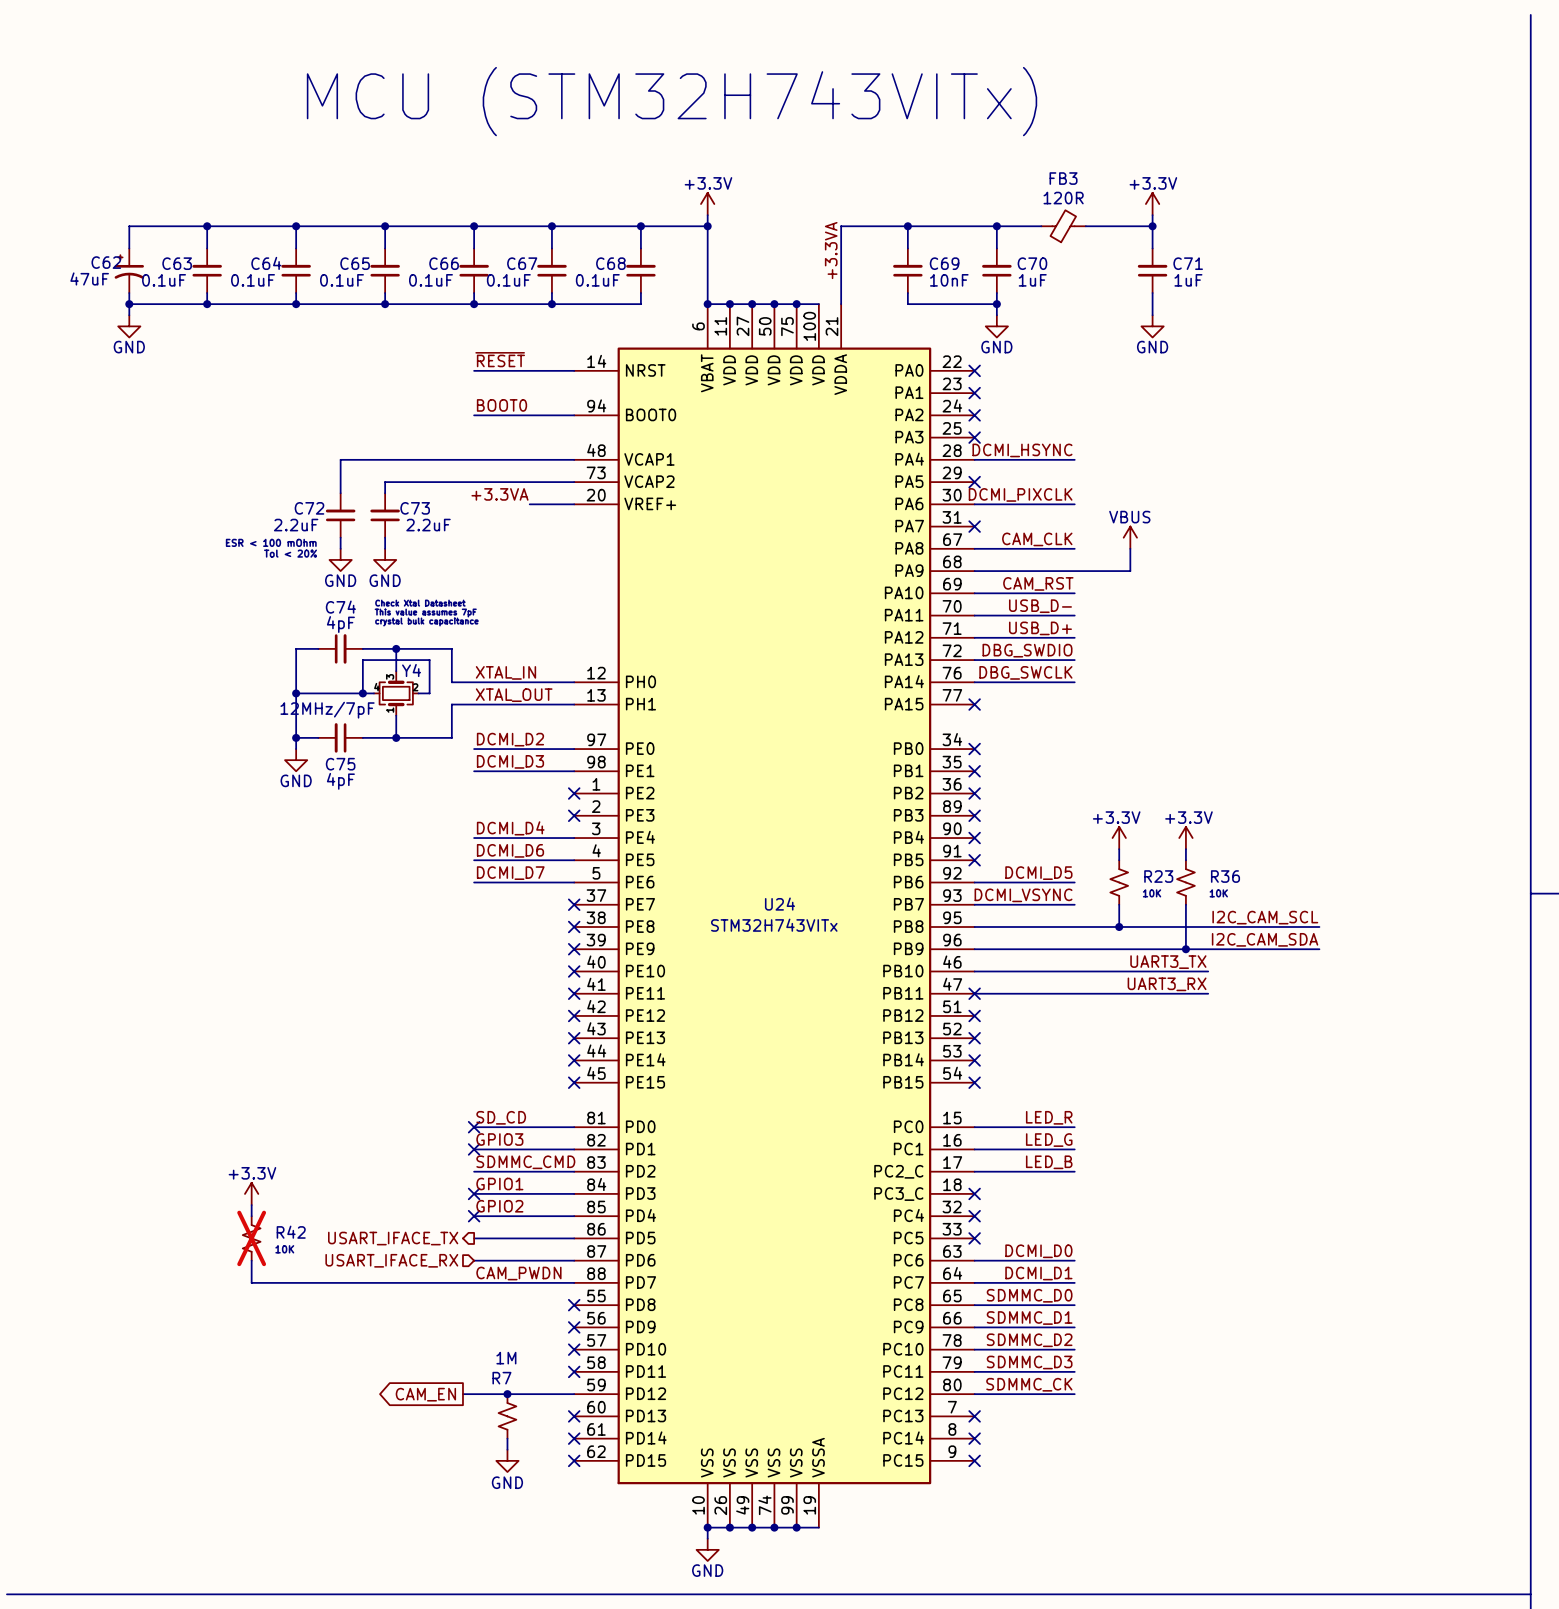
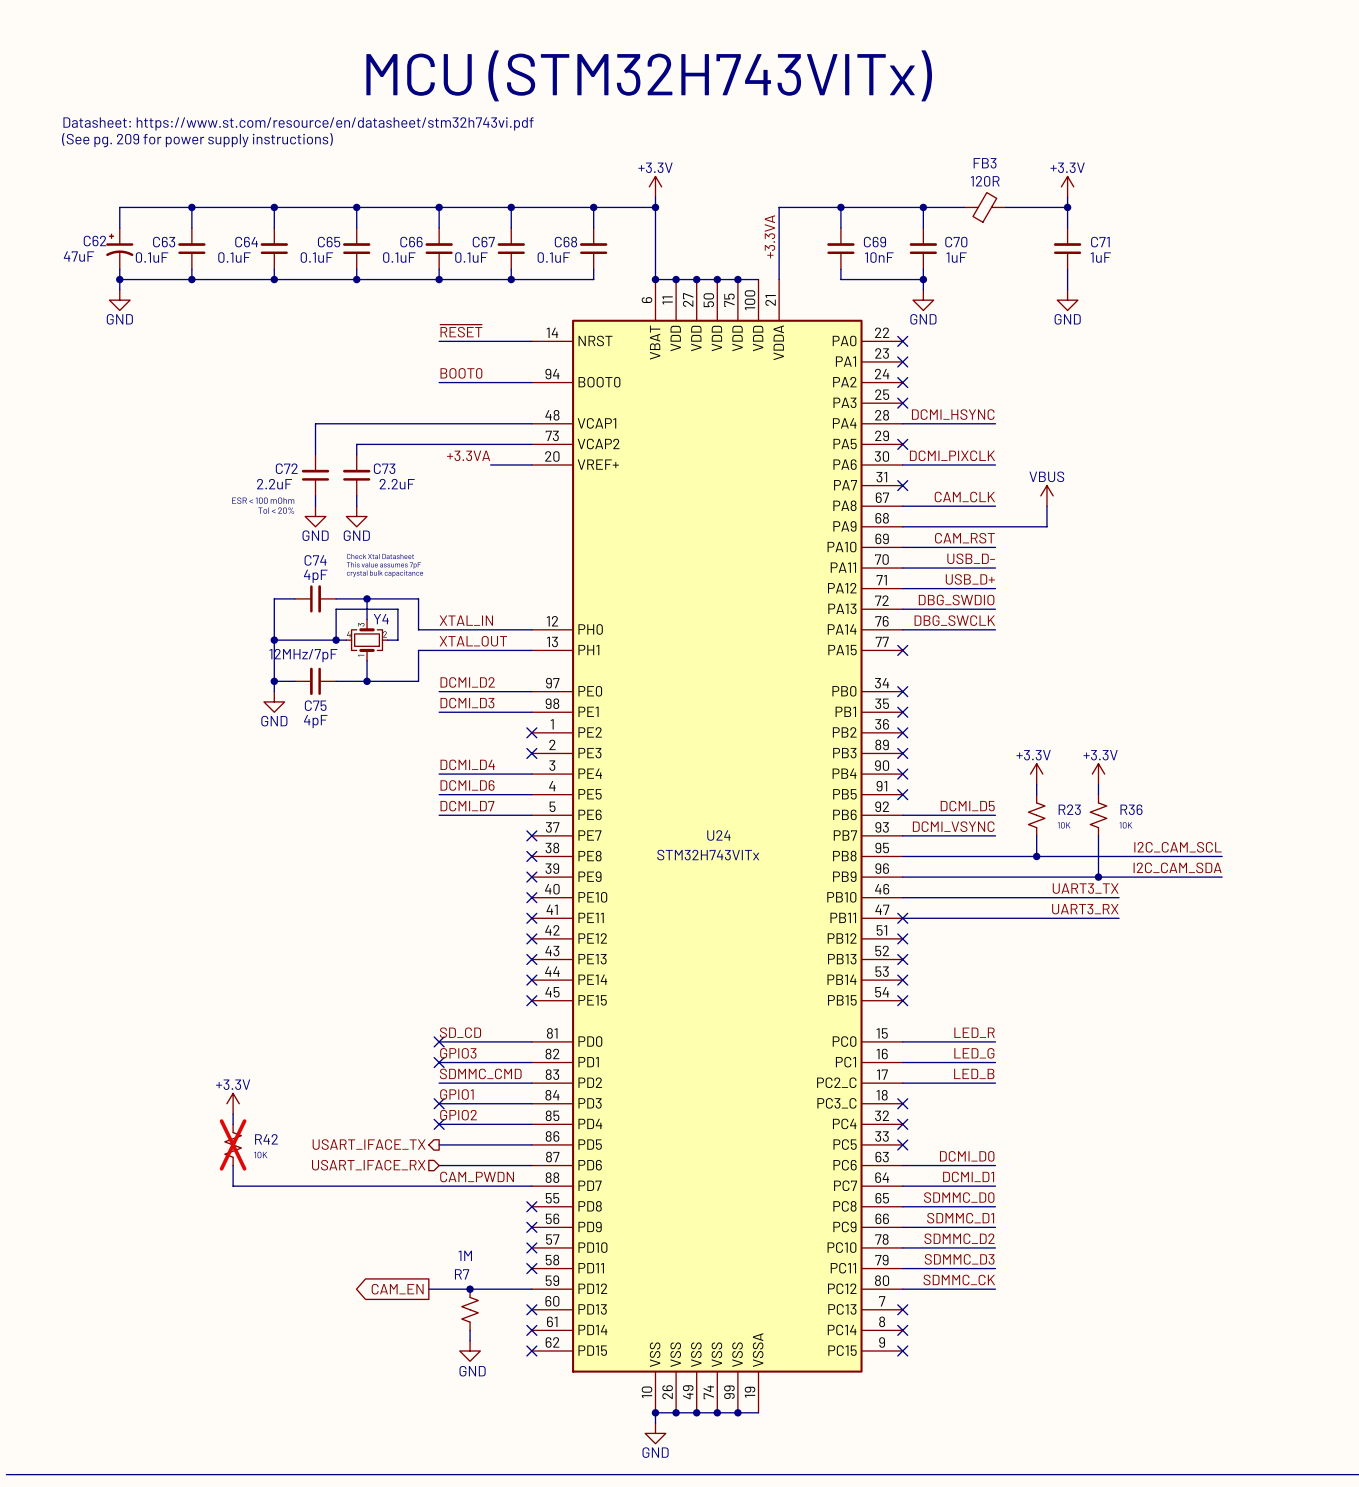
text position: MCU (STM32H743VITx) (672, 101) -> MCU (STM32H743VITx) (649, 75)
text: none -> Datasheet: https://www.st.com/resource/en/datasheet/stm32h743vi.pdf (298, 123)
text: none -> (See pg. 209 for power supply instructions) (197, 140)

